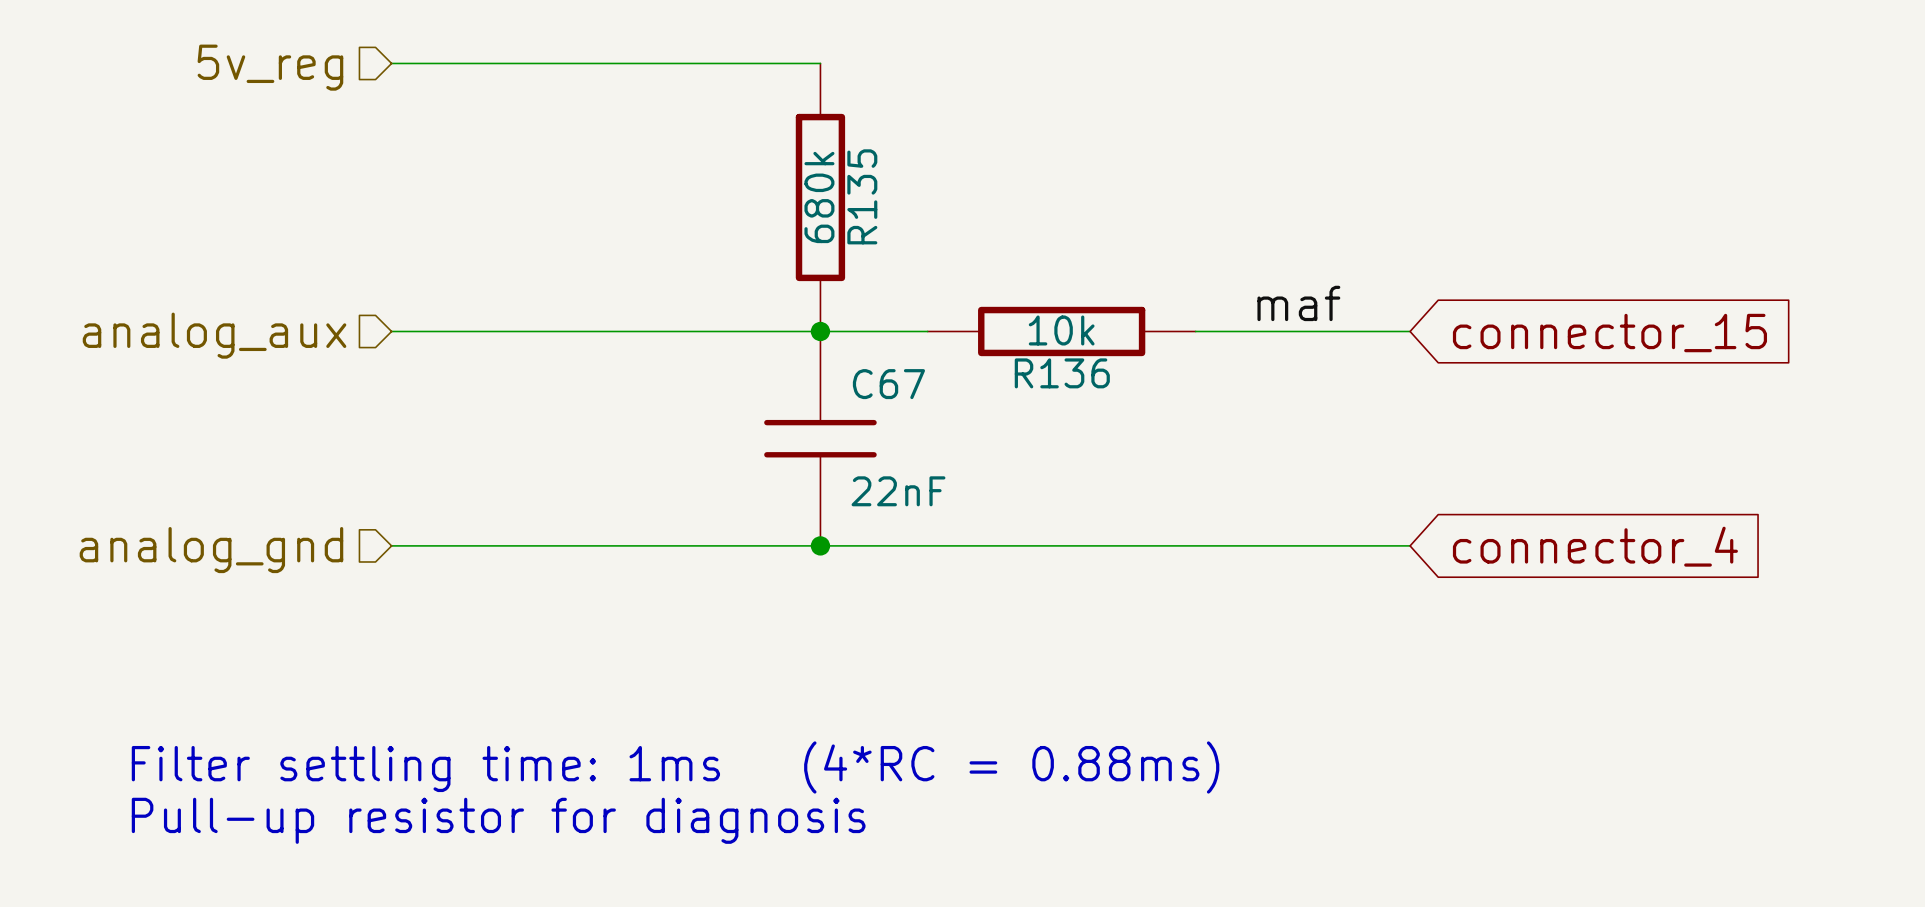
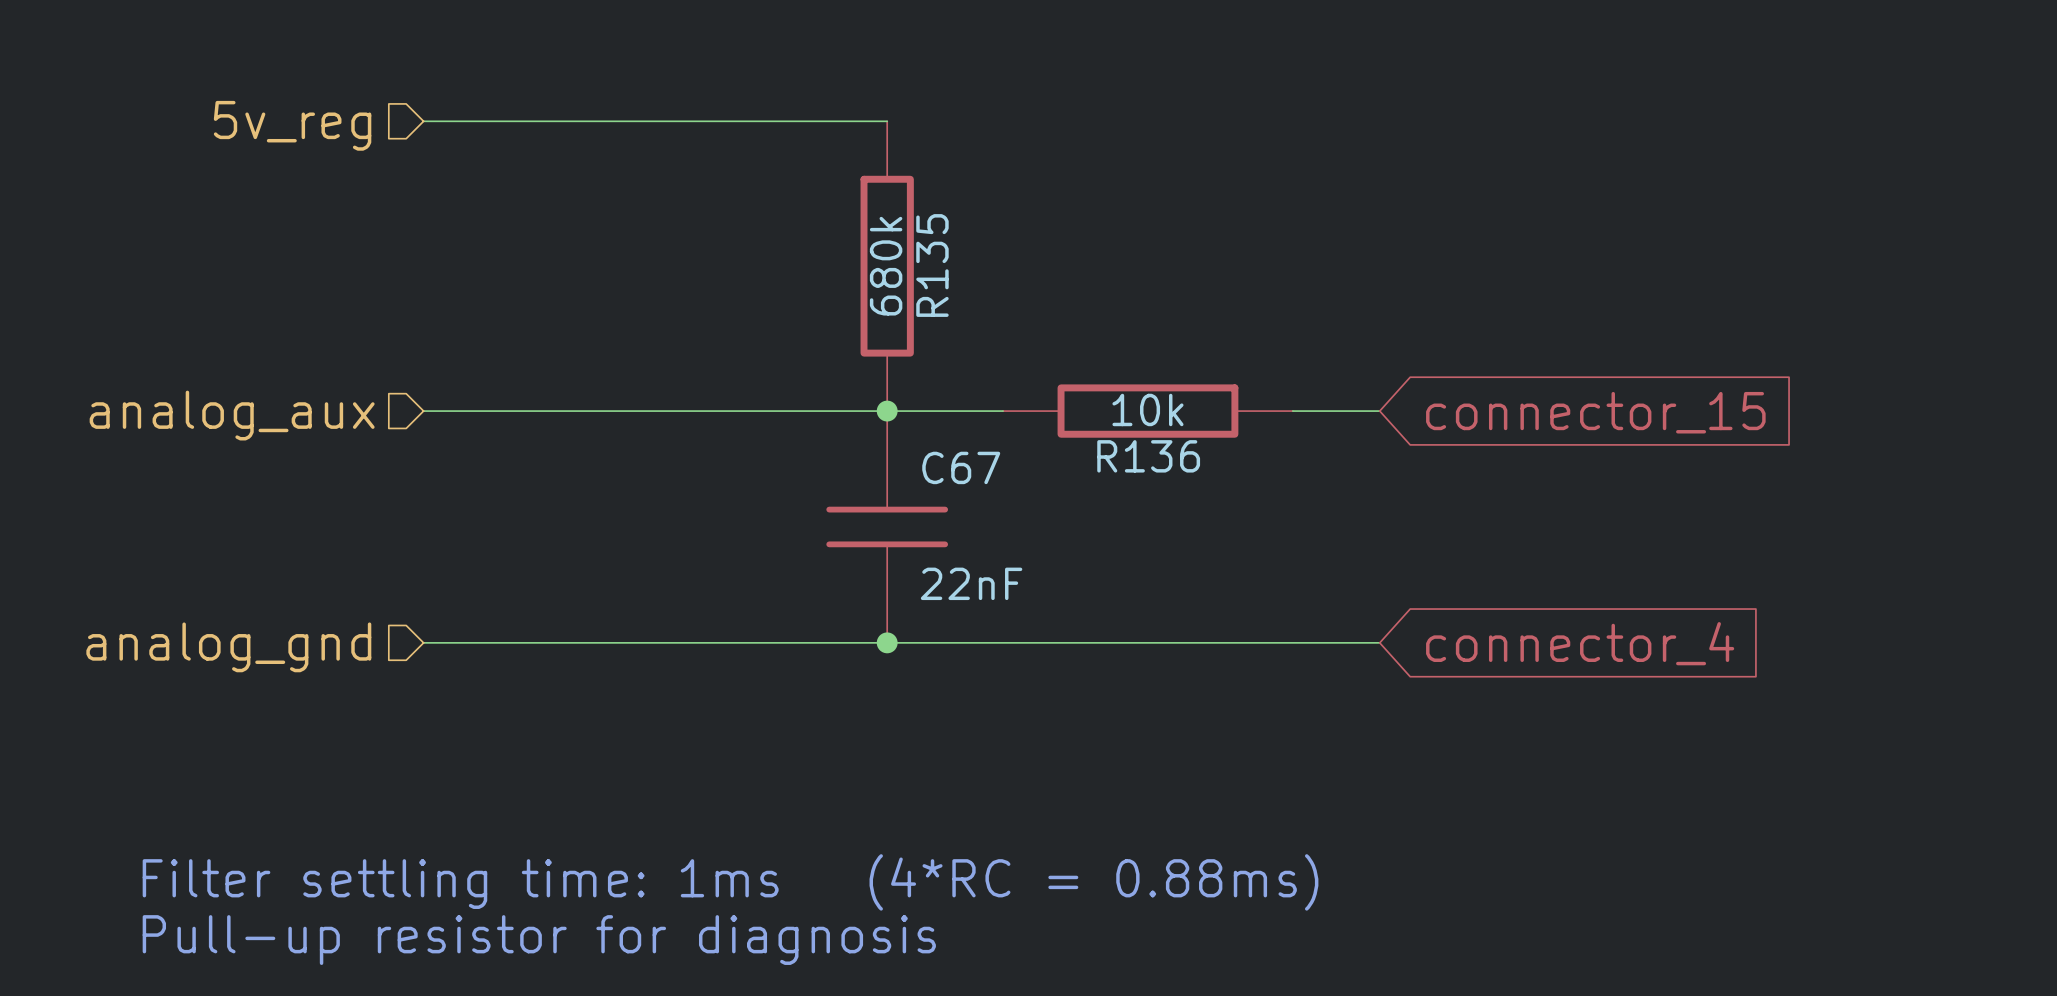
label: maf (1298, 303) -> none
wire: (1276, 331) (1410, 331) -> none
global label position: connector_15 (1609, 333) -> connector_15 (1595, 412)
wire: (1276, 545) (1410, 545) -> none
global label position: connector_4 (1595, 546) -> connector_4 (1580, 643)

